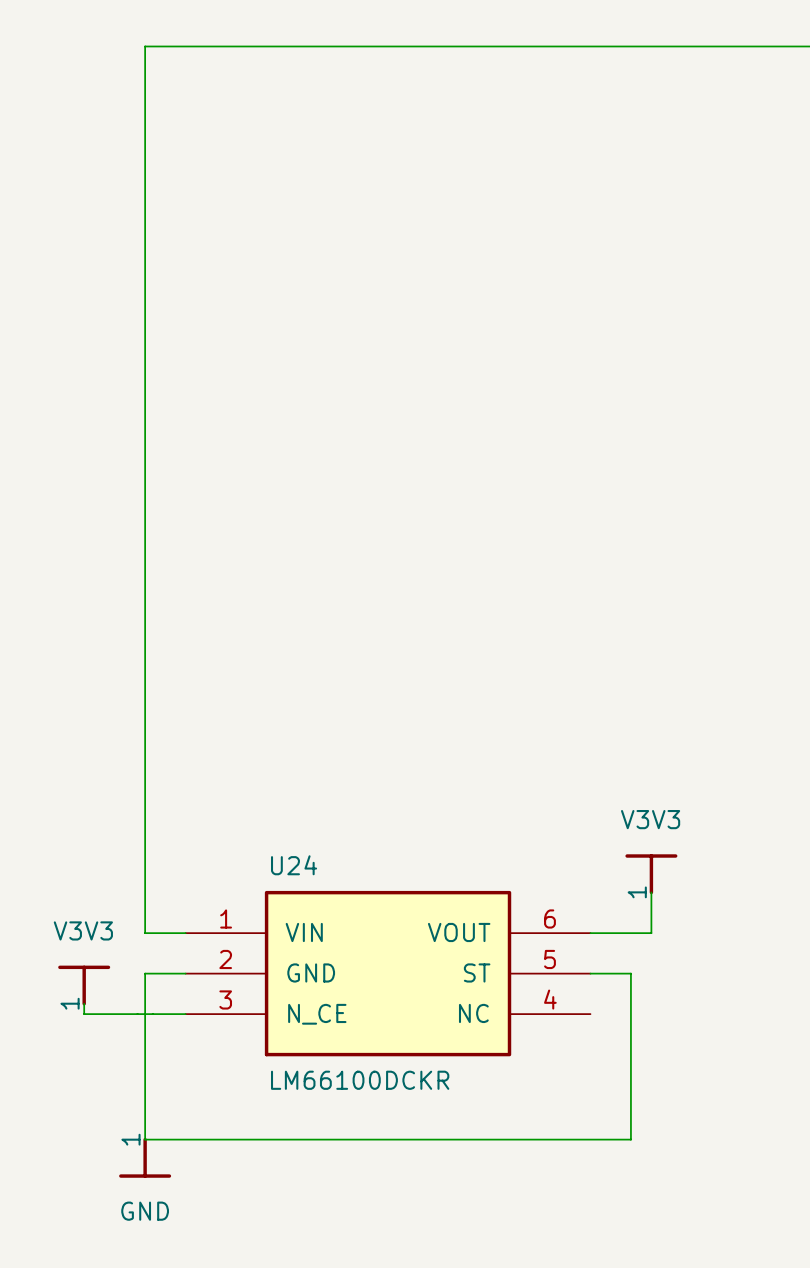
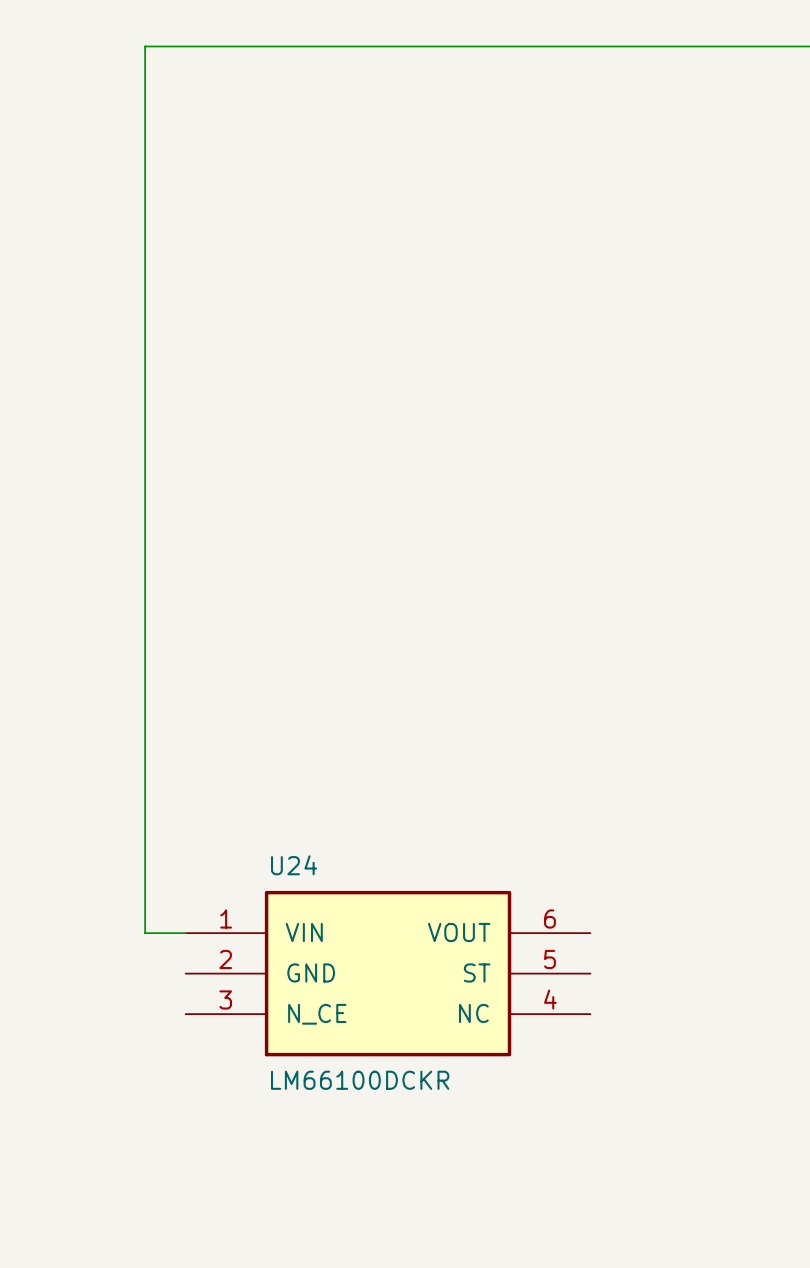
V3V3: (651, 874) -> none
wire: (651, 892) (651, 933) (590, 933) -> none
wire: (185, 973) (145, 973) (145, 1139) (630, 1139) (630, 973) (590, 973) -> none
V3V3: (84, 985) -> none
wire: (84, 1003) (84, 1014) (185, 1014) -> none
GND: (145, 1157) -> none

